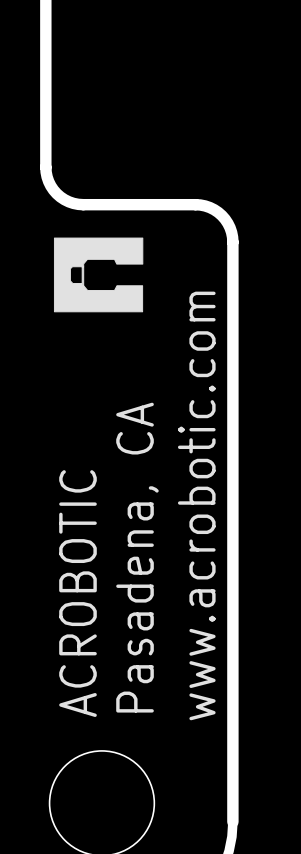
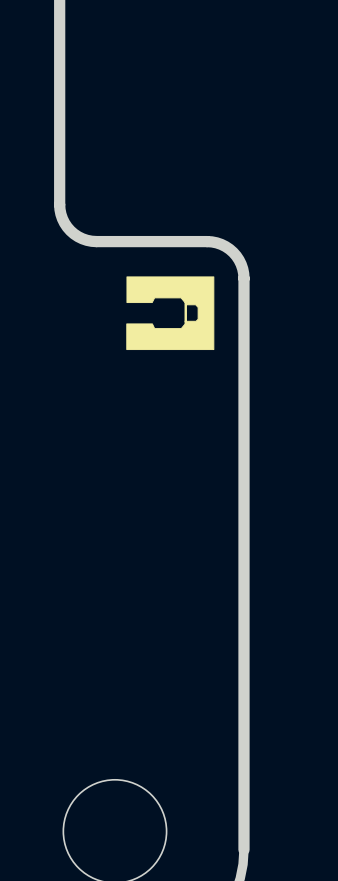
drawing: [53, 237, 144, 313] -> none
drawing: none -> [126, 276, 215, 351]
text: www.acrobotic.com (196, 505) -> none
text: Pasadena, CA (137, 557) -> none
text: ACROBOTIC (78, 593) -> none

